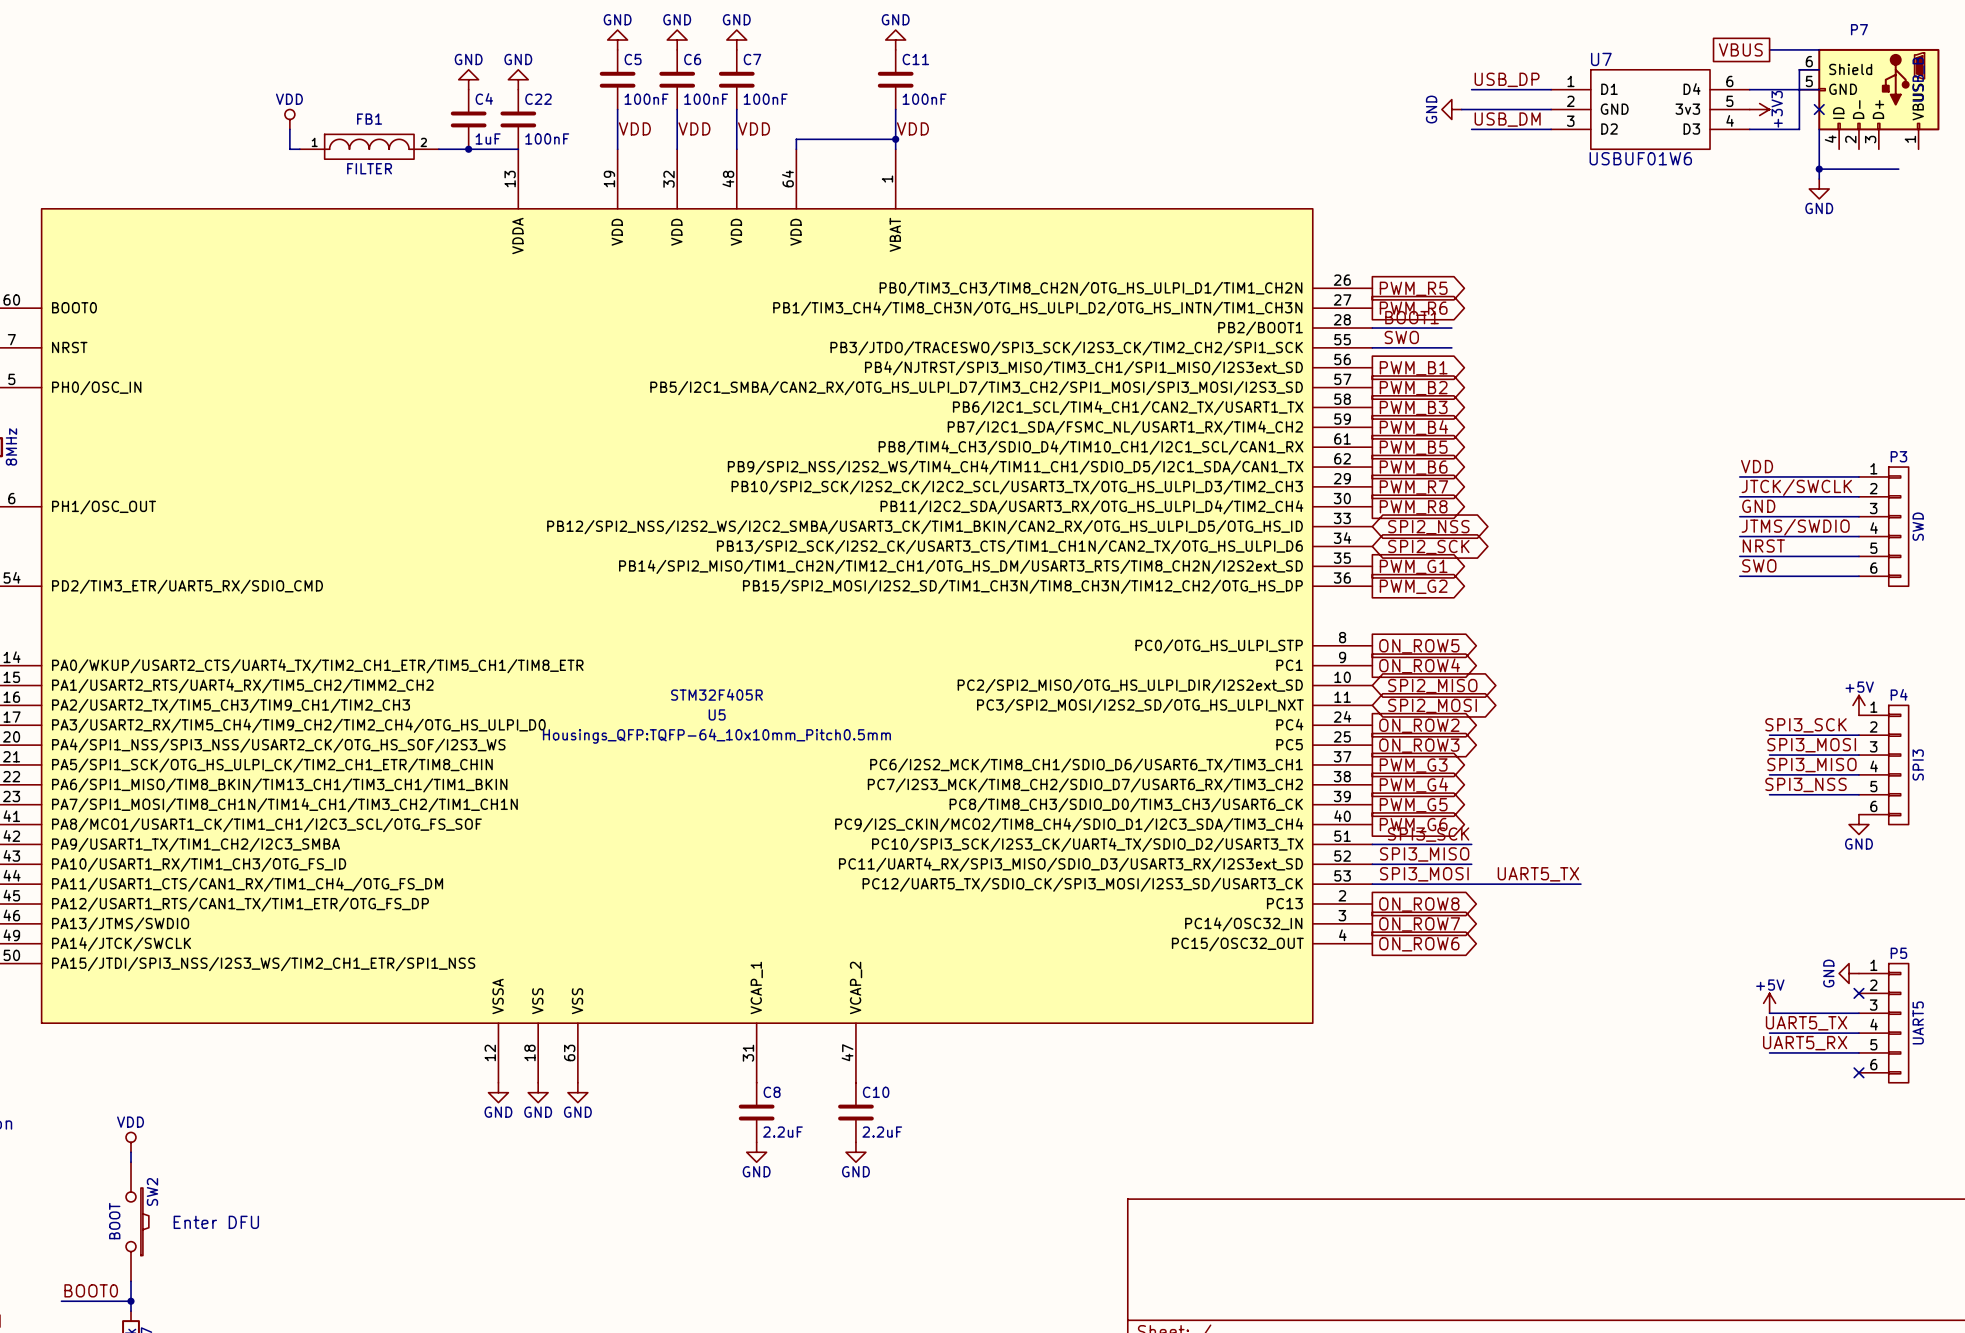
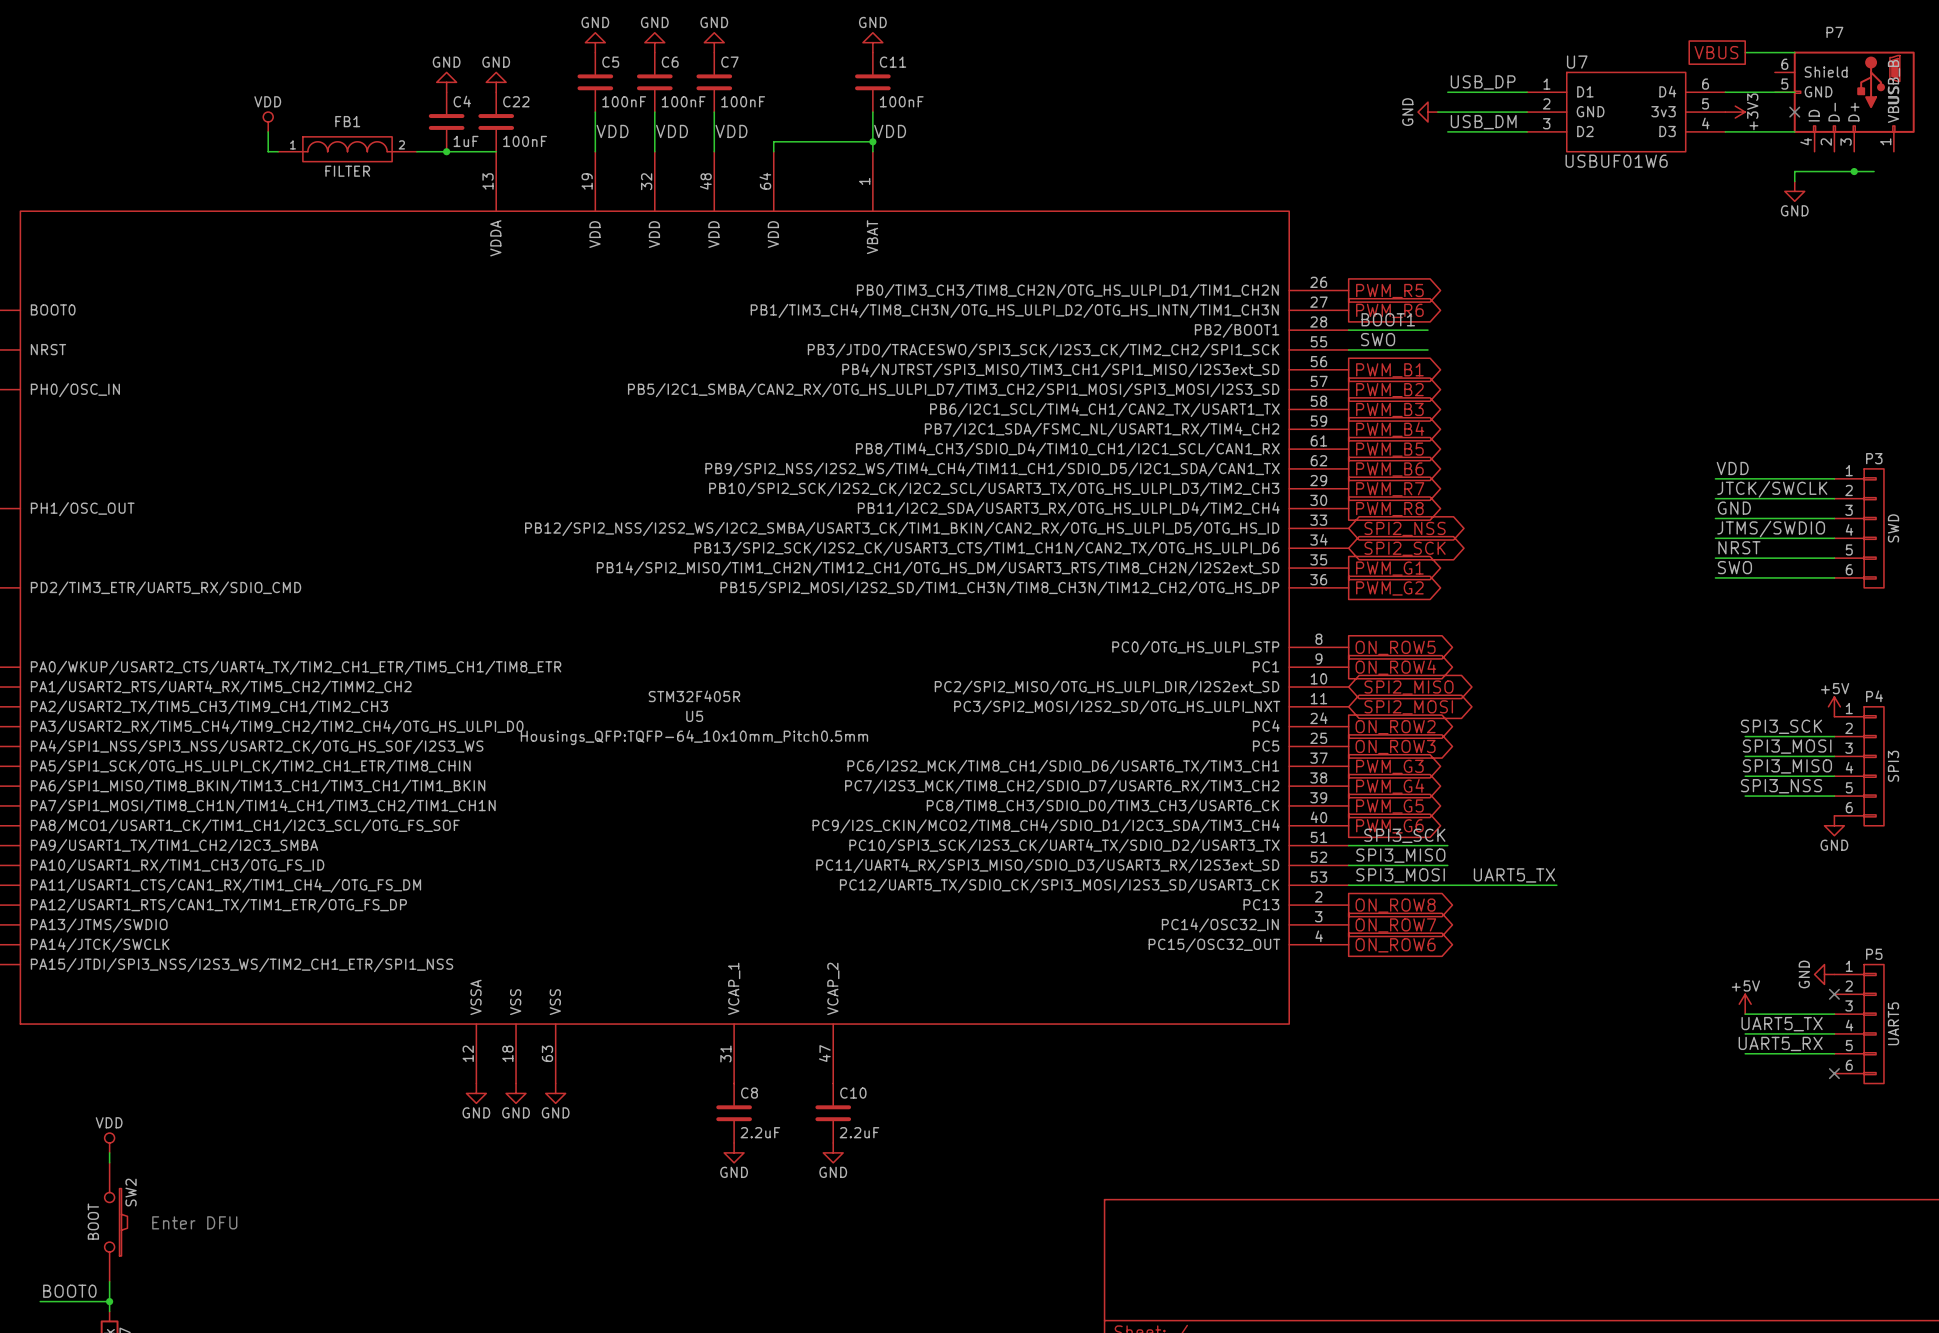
wire: (1819, 69) (1799, 69) (1799, 129) -> none
wire: (1819, 129) (1819, 169) -> (1794, 131) (1774, 131)
junction: (1819, 169) -> none
junction: none -> (1854, 171)

